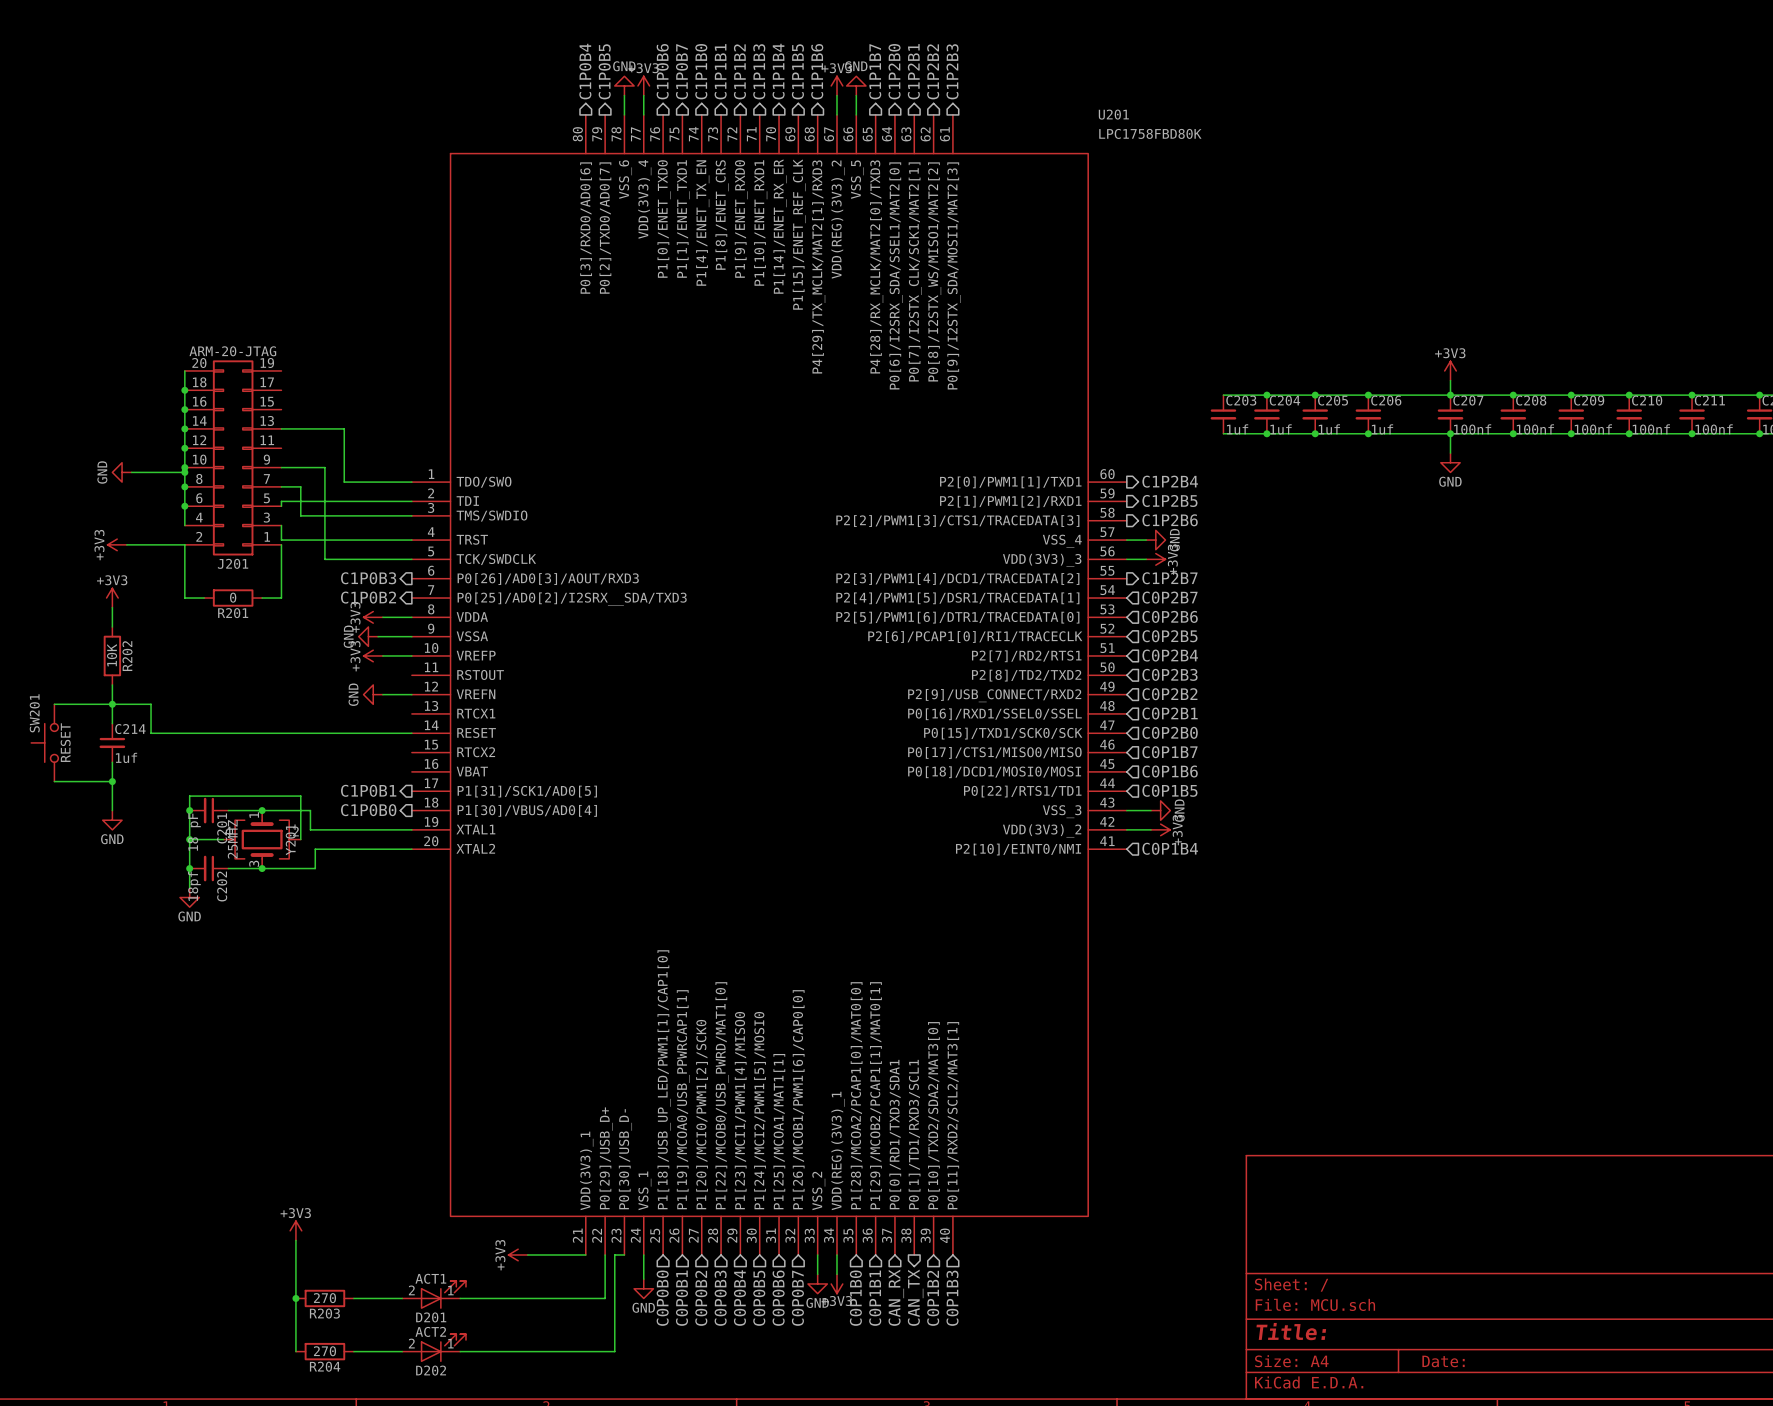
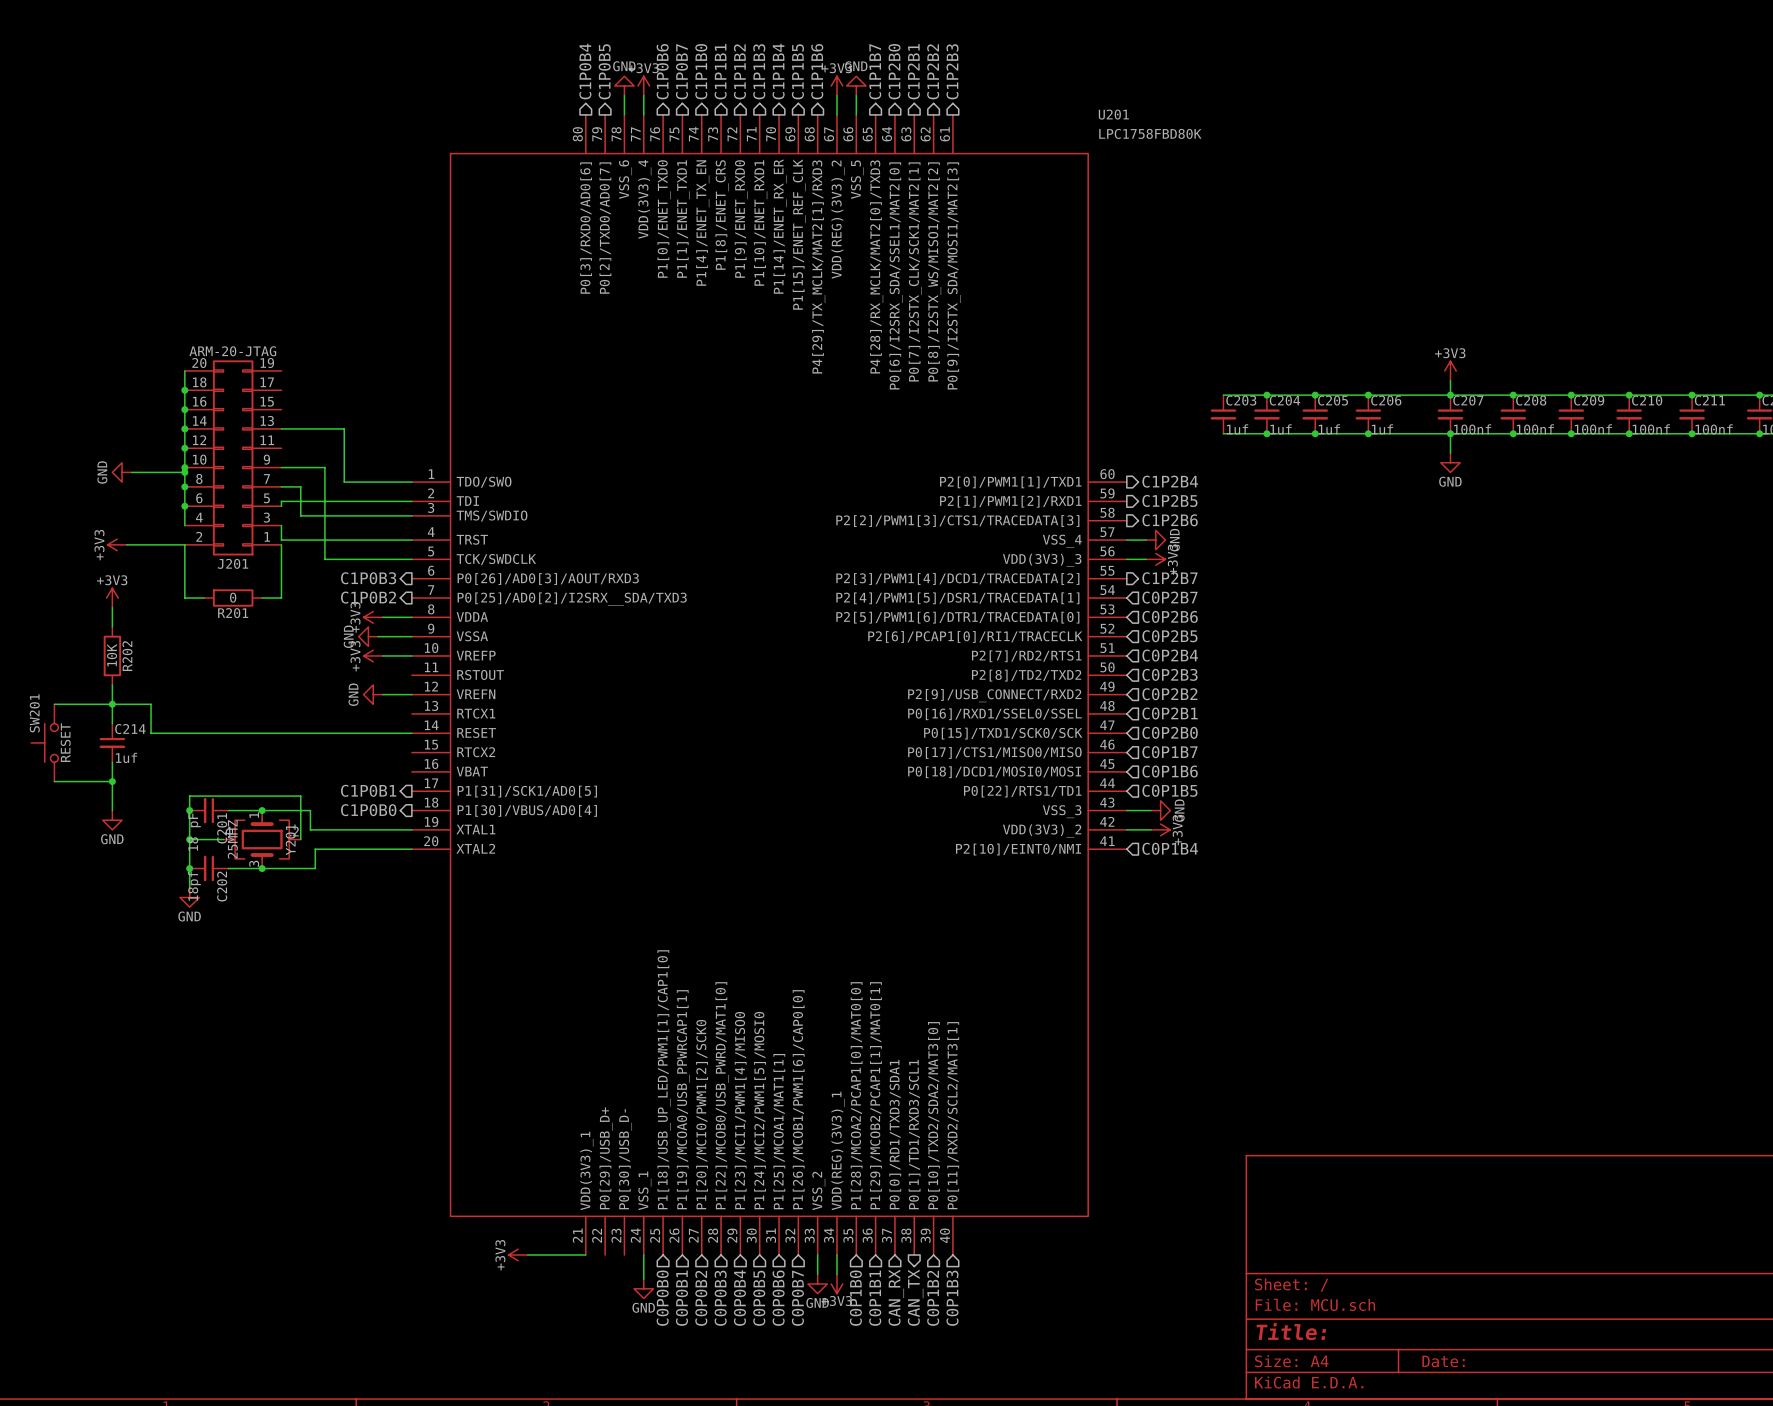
power symbol: +3V3 (295, 1230) -> none
wire: (295, 1240) (295, 1351) -> none
wire: (605, 1254) (605, 1298) (460, 1298) -> none
wire: (624, 1254) (614, 1254) (614, 1351) (460, 1351) -> none
D201: ACT1 (434, 1294) -> none
junction: (295, 1298) -> none
R203: 270 (324, 1298) -> none
wire: (353, 1298) (402, 1298) -> none
D202: ACT2 (434, 1348) -> none
R204: 270 (324, 1351) -> none
wire: (353, 1351) (402, 1351) -> none

